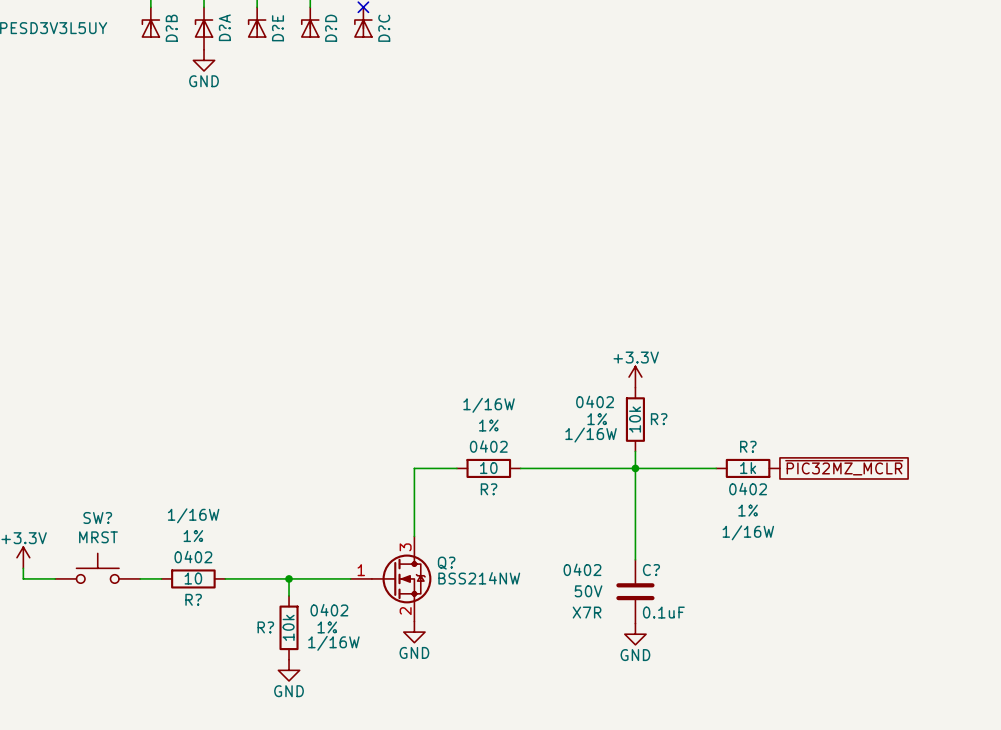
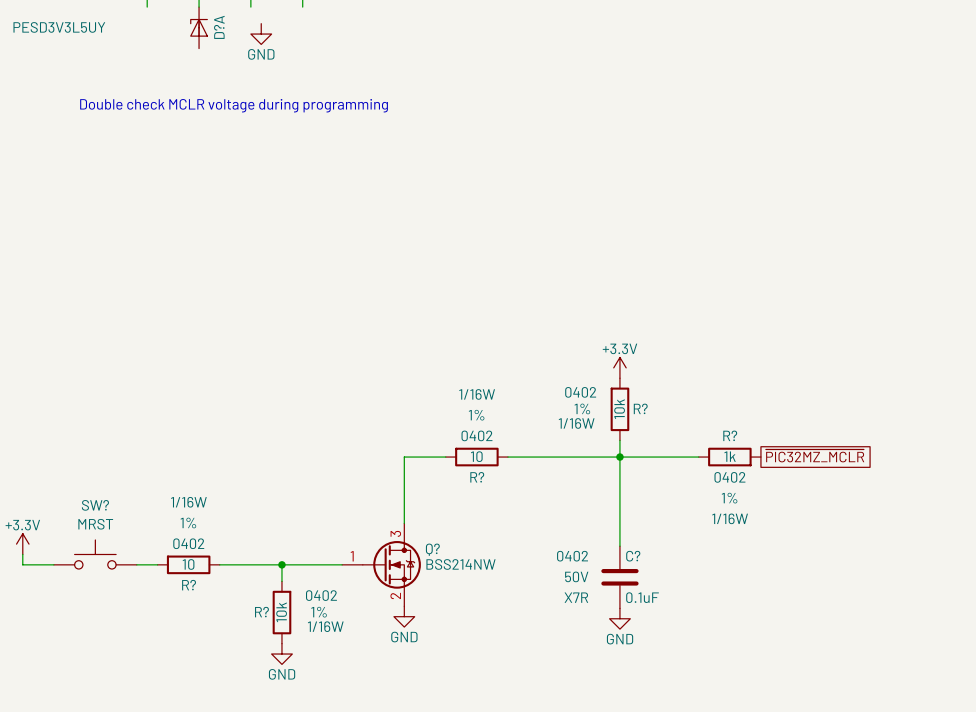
no-connect mark: (363, 7) -> none
D?B: (150, 22) -> none
D?E: (257, 22) -> none
D?D: (310, 22) -> none
D?C: (363, 22) -> none
power symbol position: GND (204, 60) -> GND (261, 34)
text: none -> Double check MCLR voltage during programming (234, 105)

